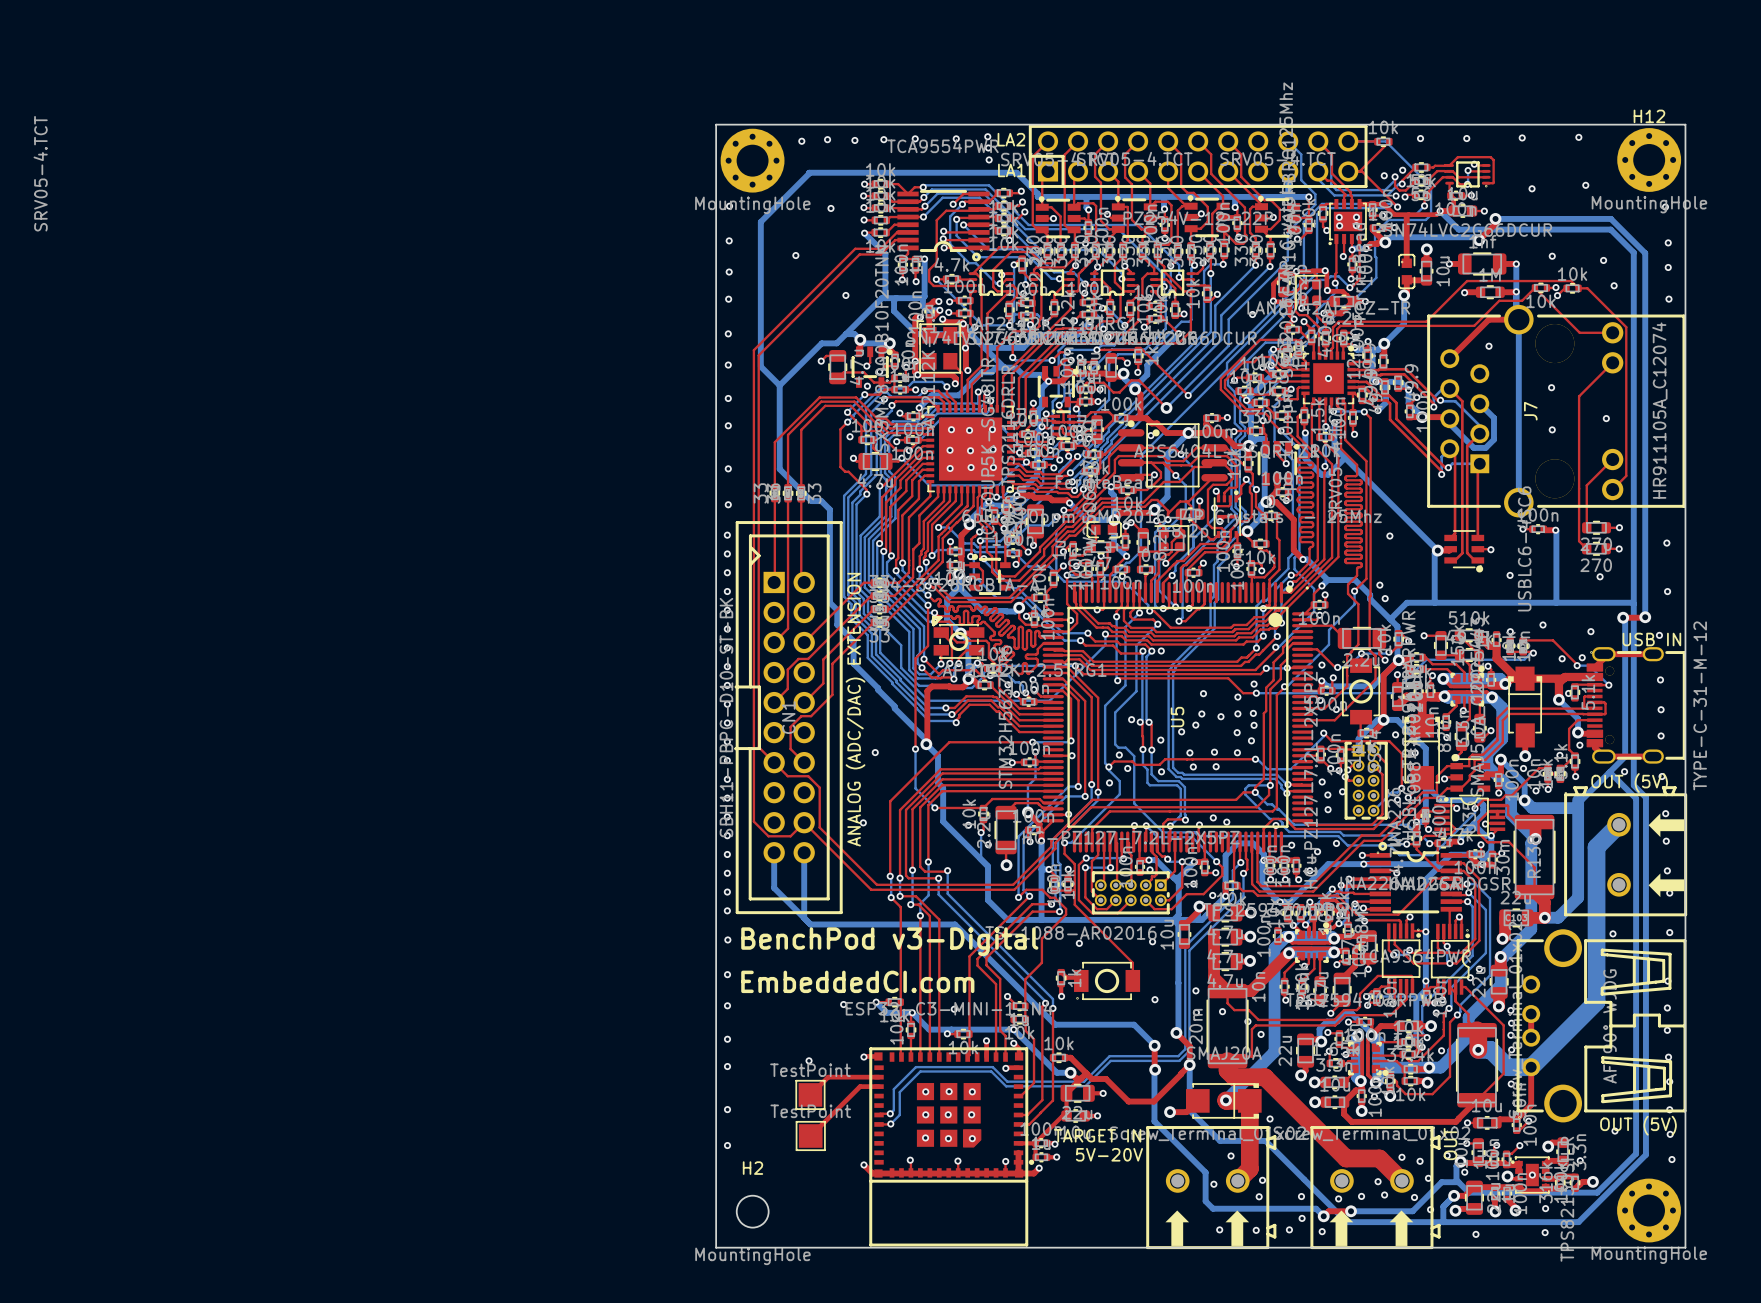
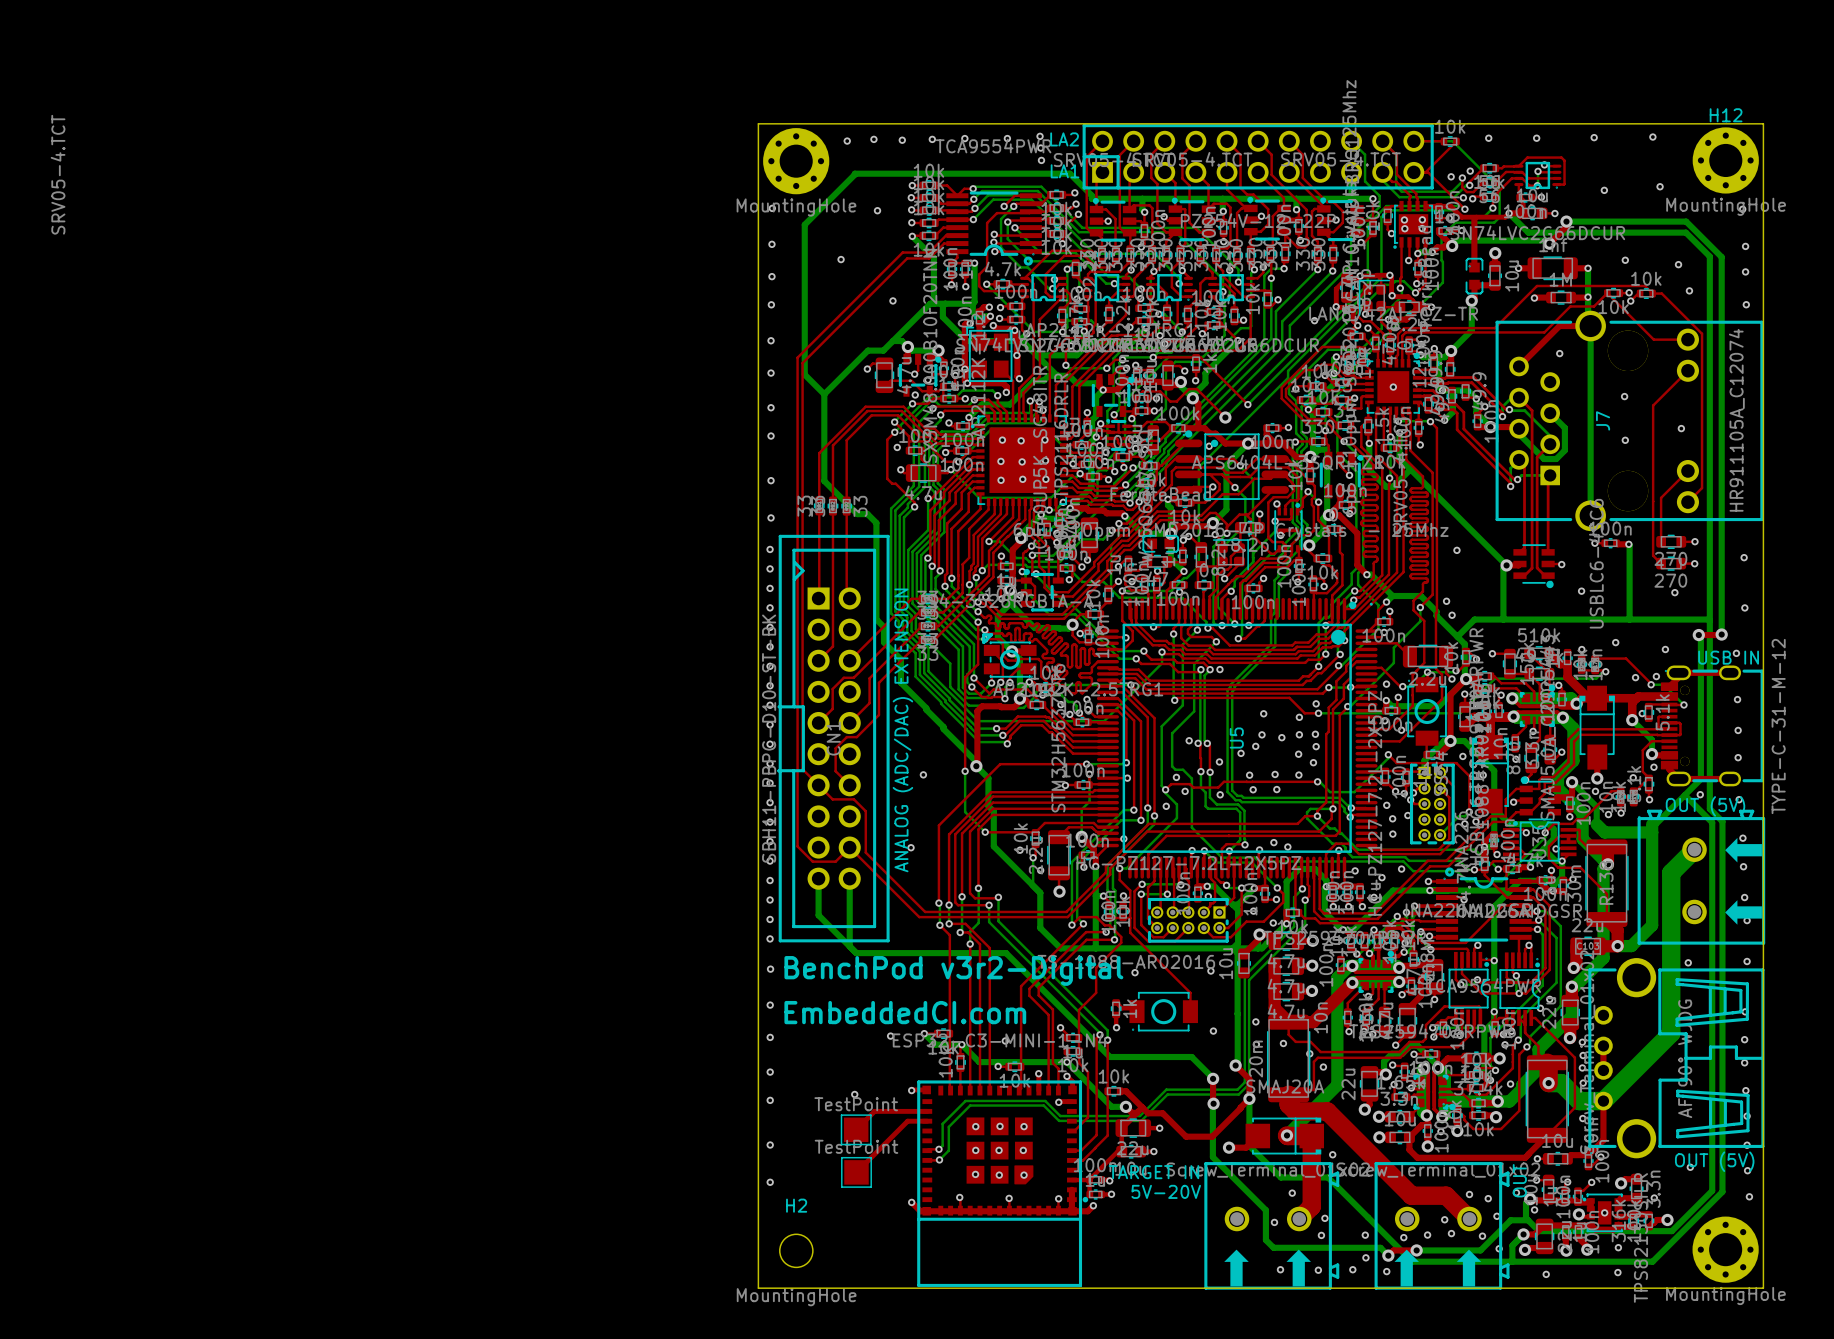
via: (1524, 800) -> none
text: BenchPod v3-Digital (889, 941) -> BenchPod v3r2-Digital (953, 970)

